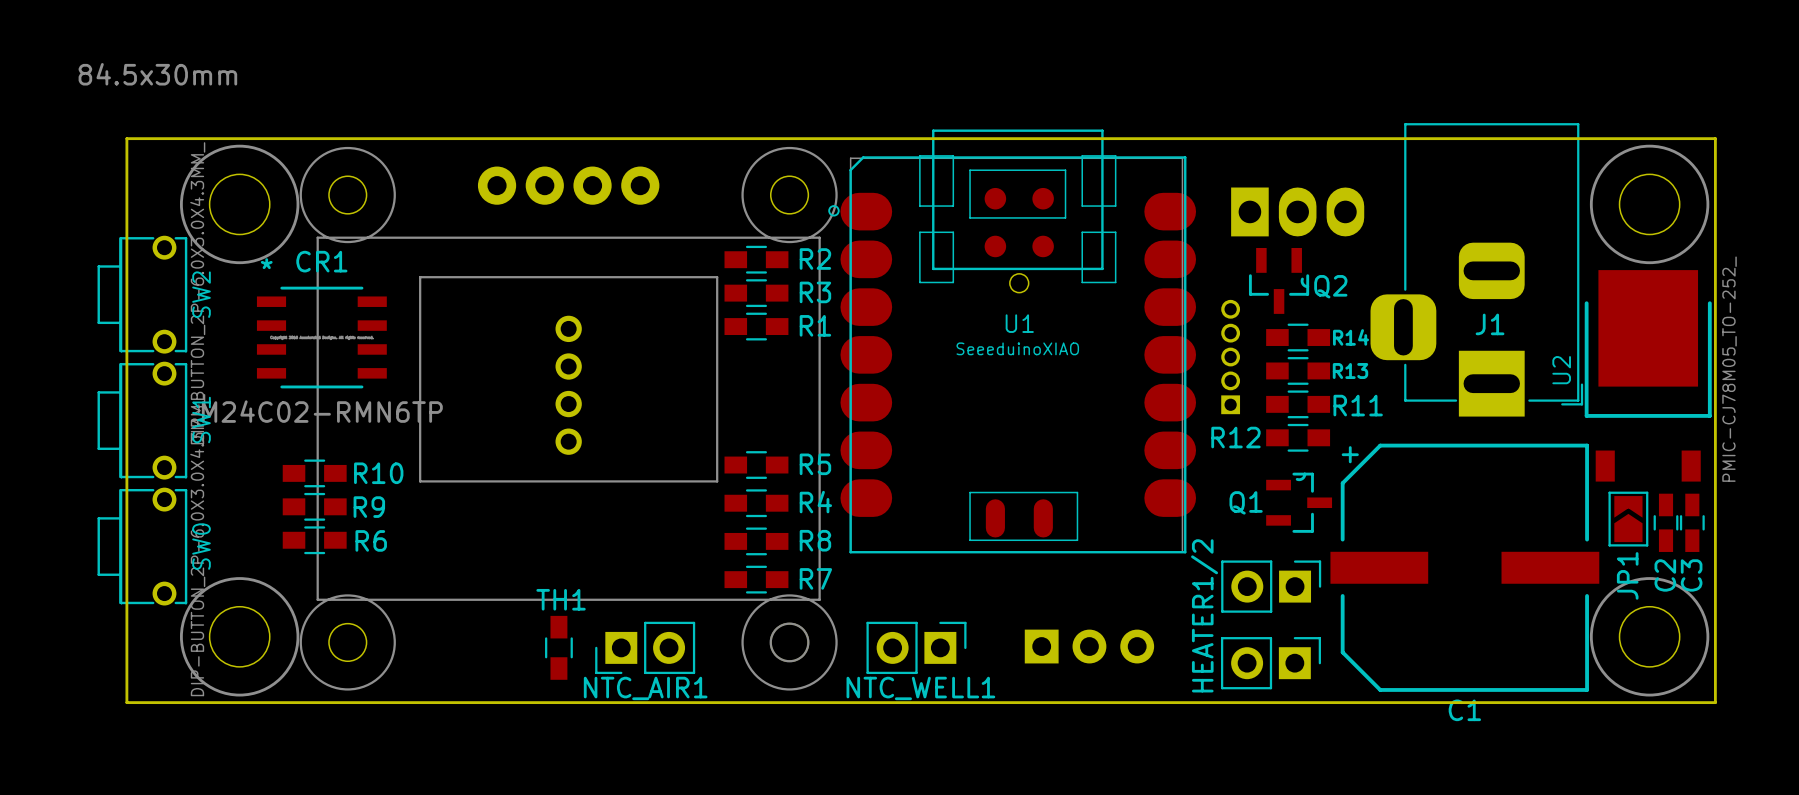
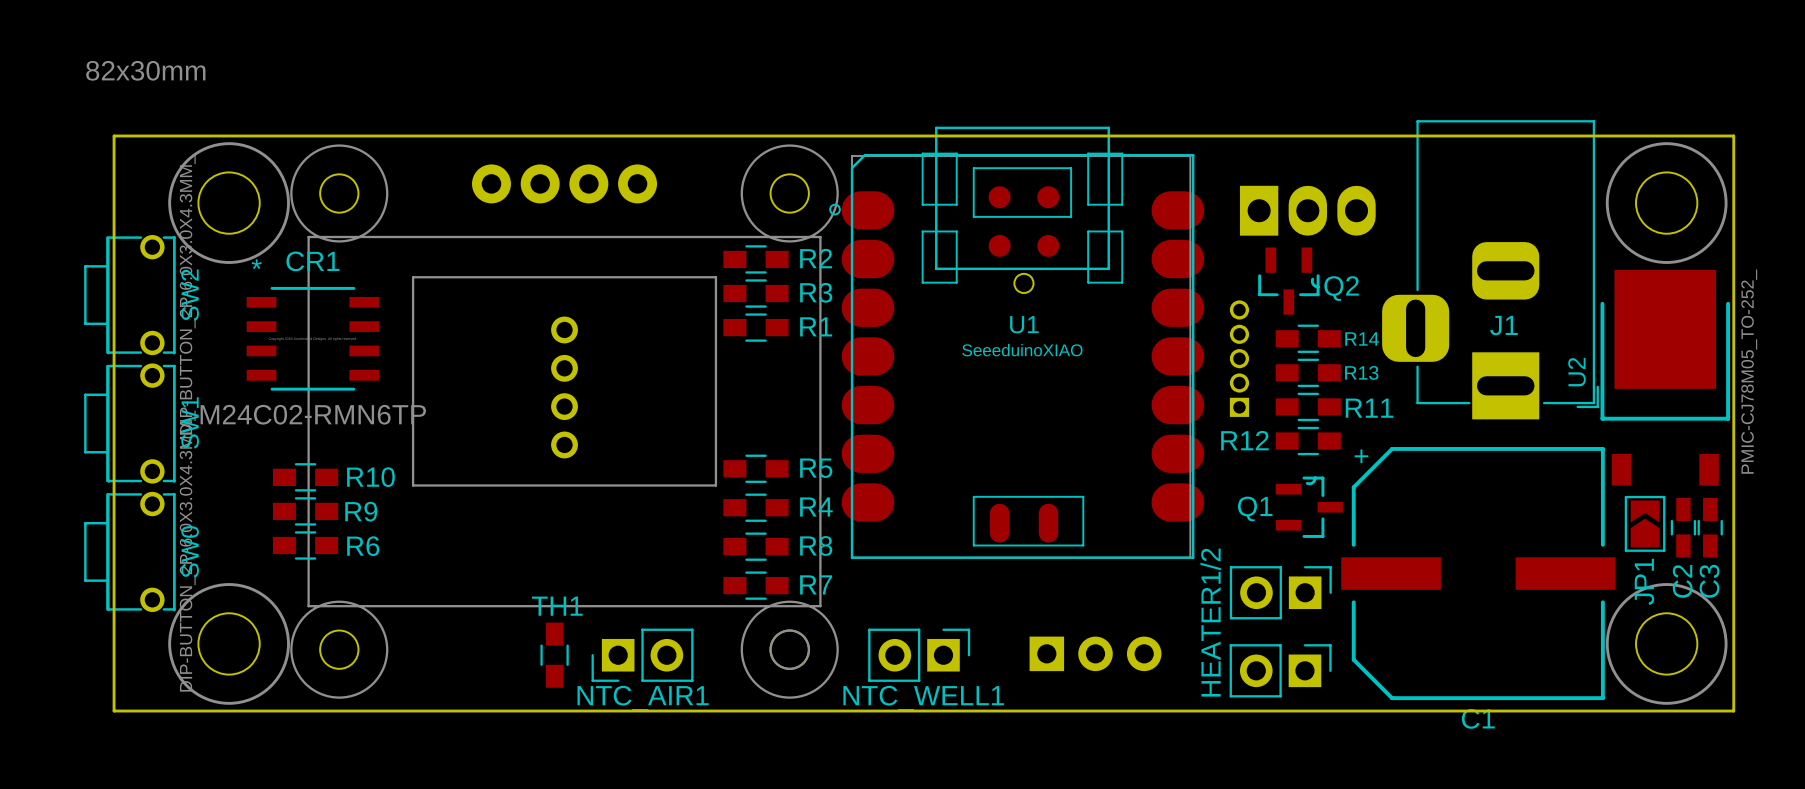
text: 84.5x30mm (157, 74) -> 82x30mm (145, 70)

